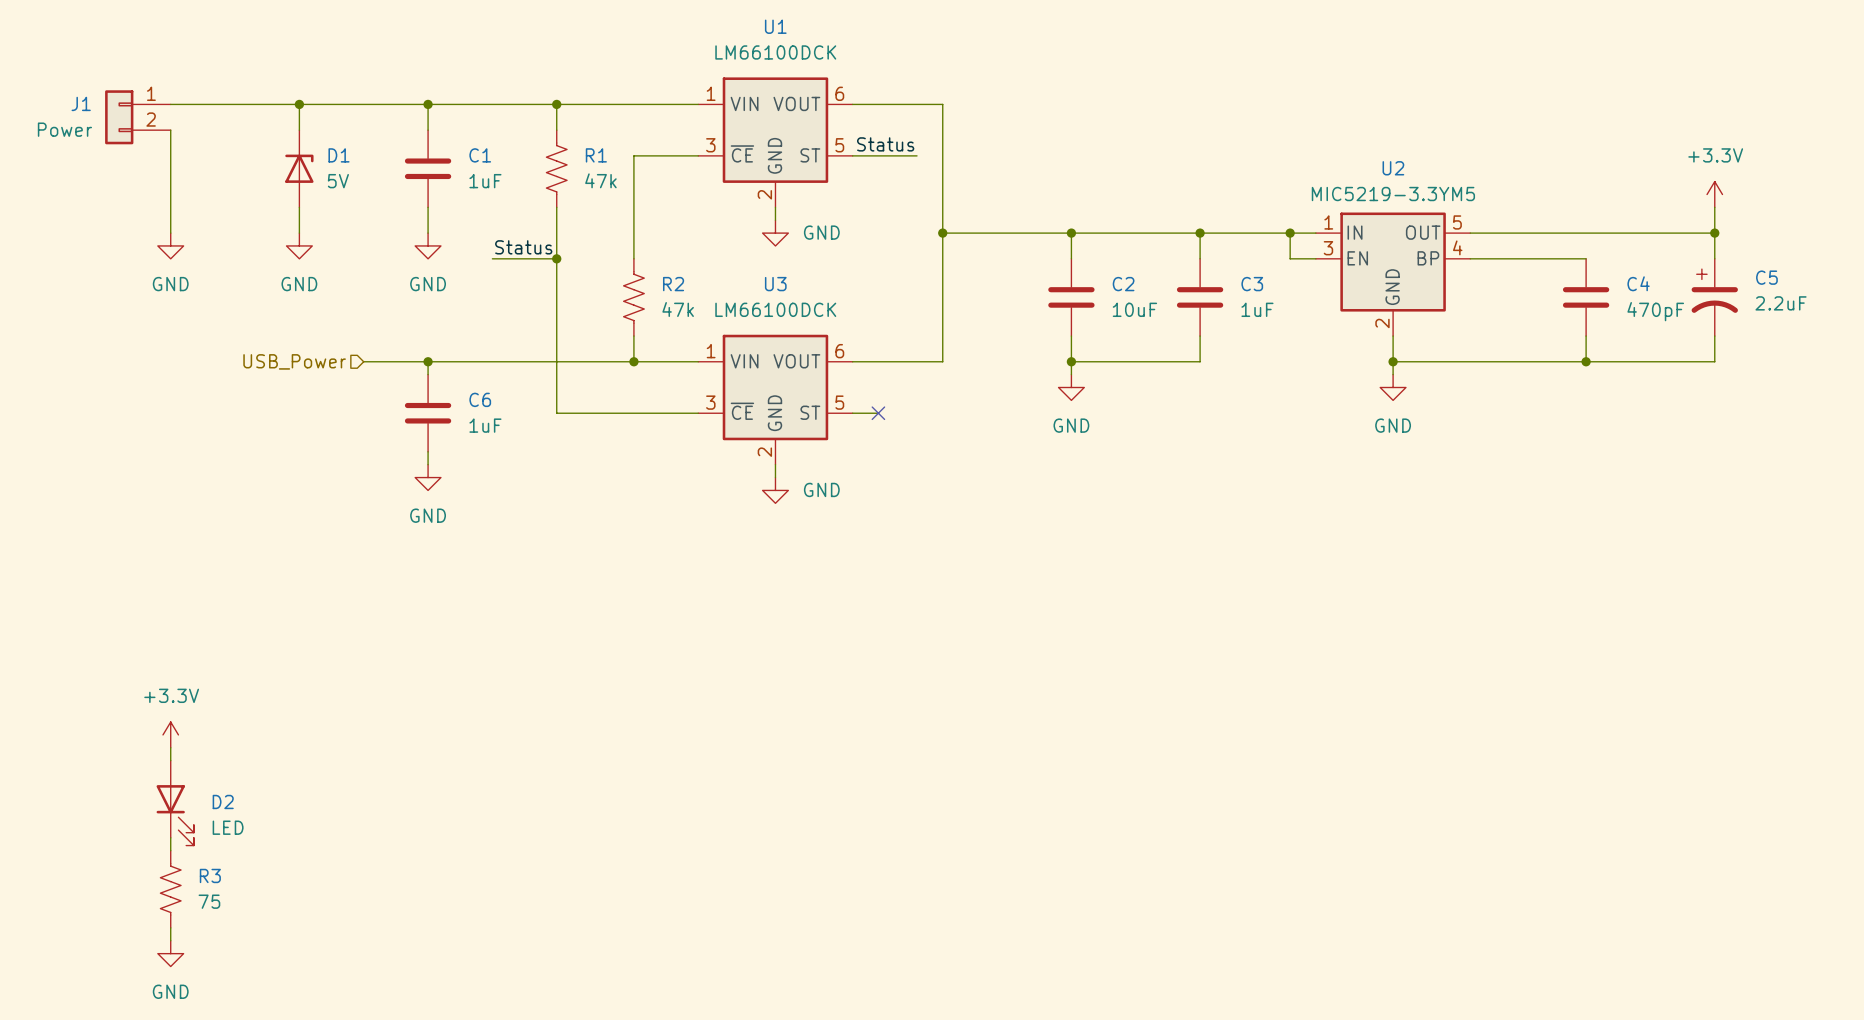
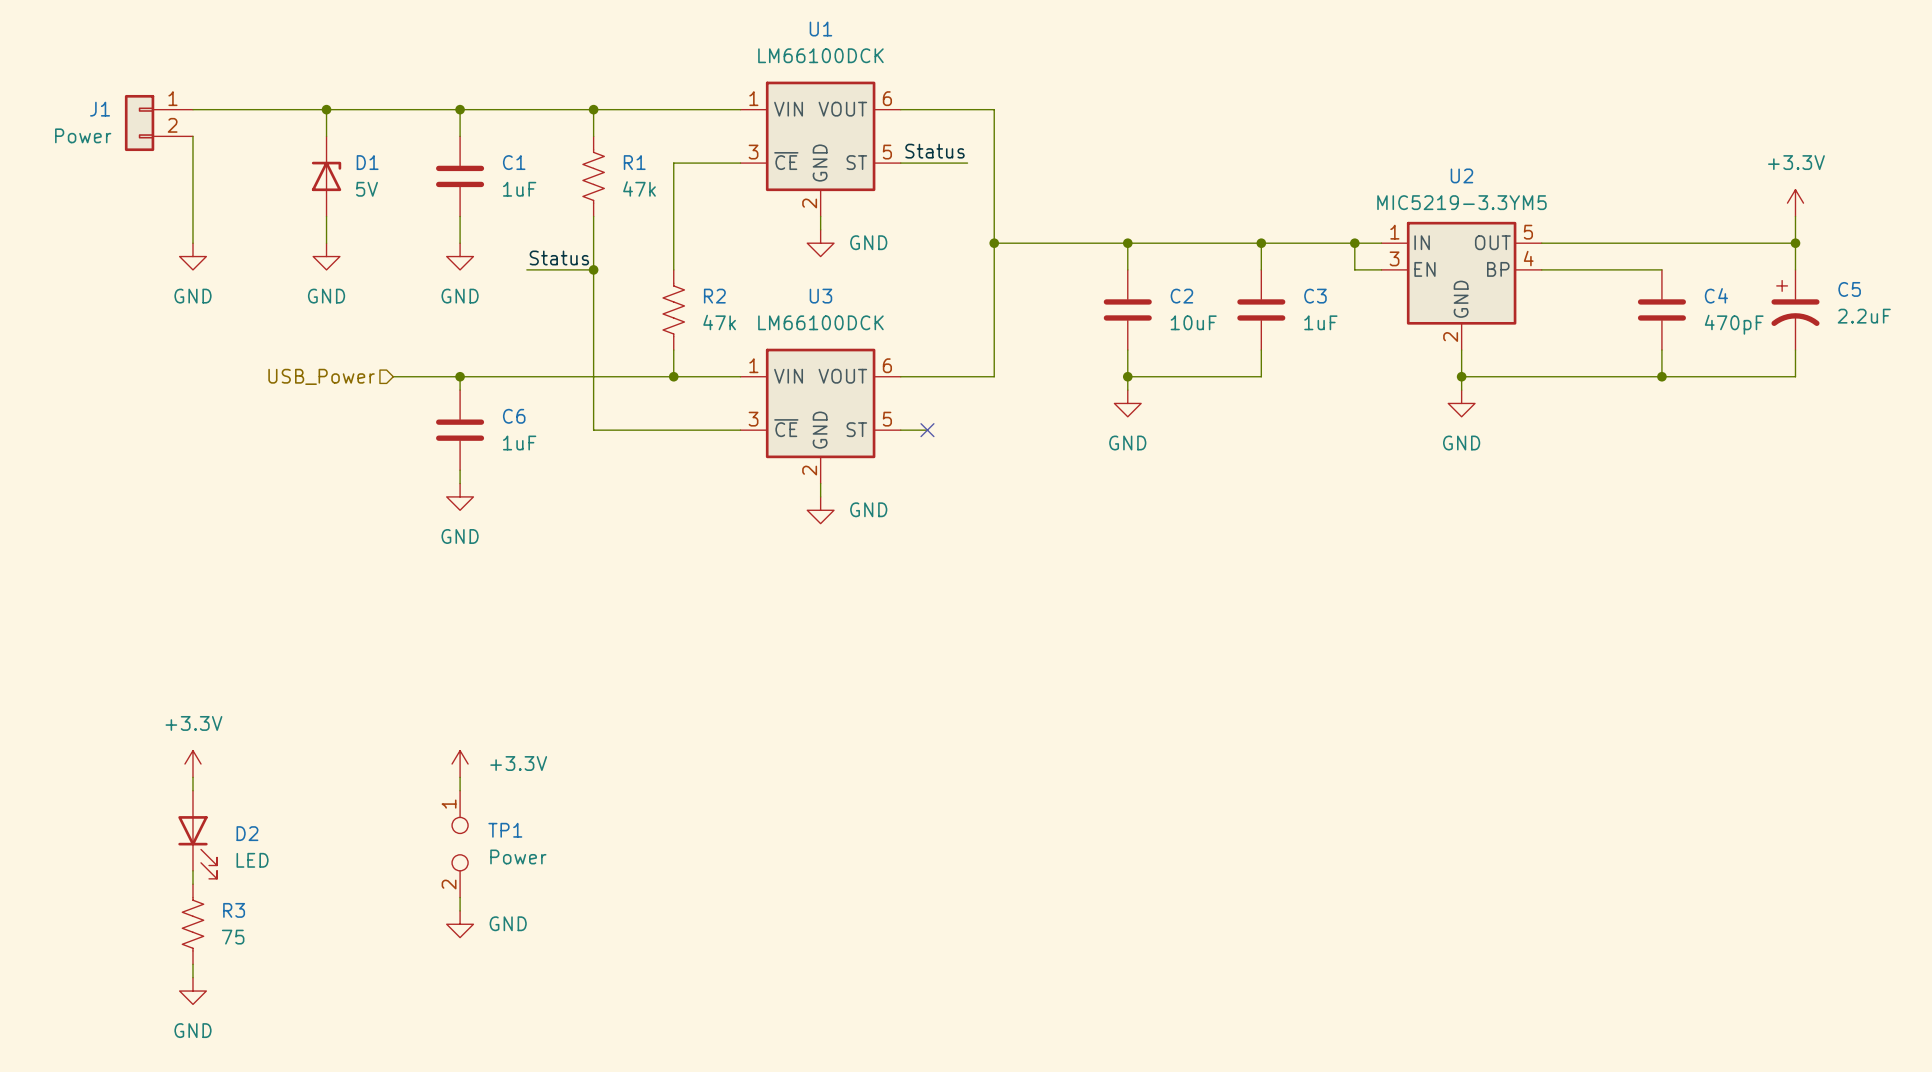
power symbol: none -> +3.3V (460, 764)
wire: none -> (460, 777) (460, 790)
TP1: none -> Power (460, 844)
wire: none -> (460, 897) (460, 910)
power symbol: none -> GND (460, 924)

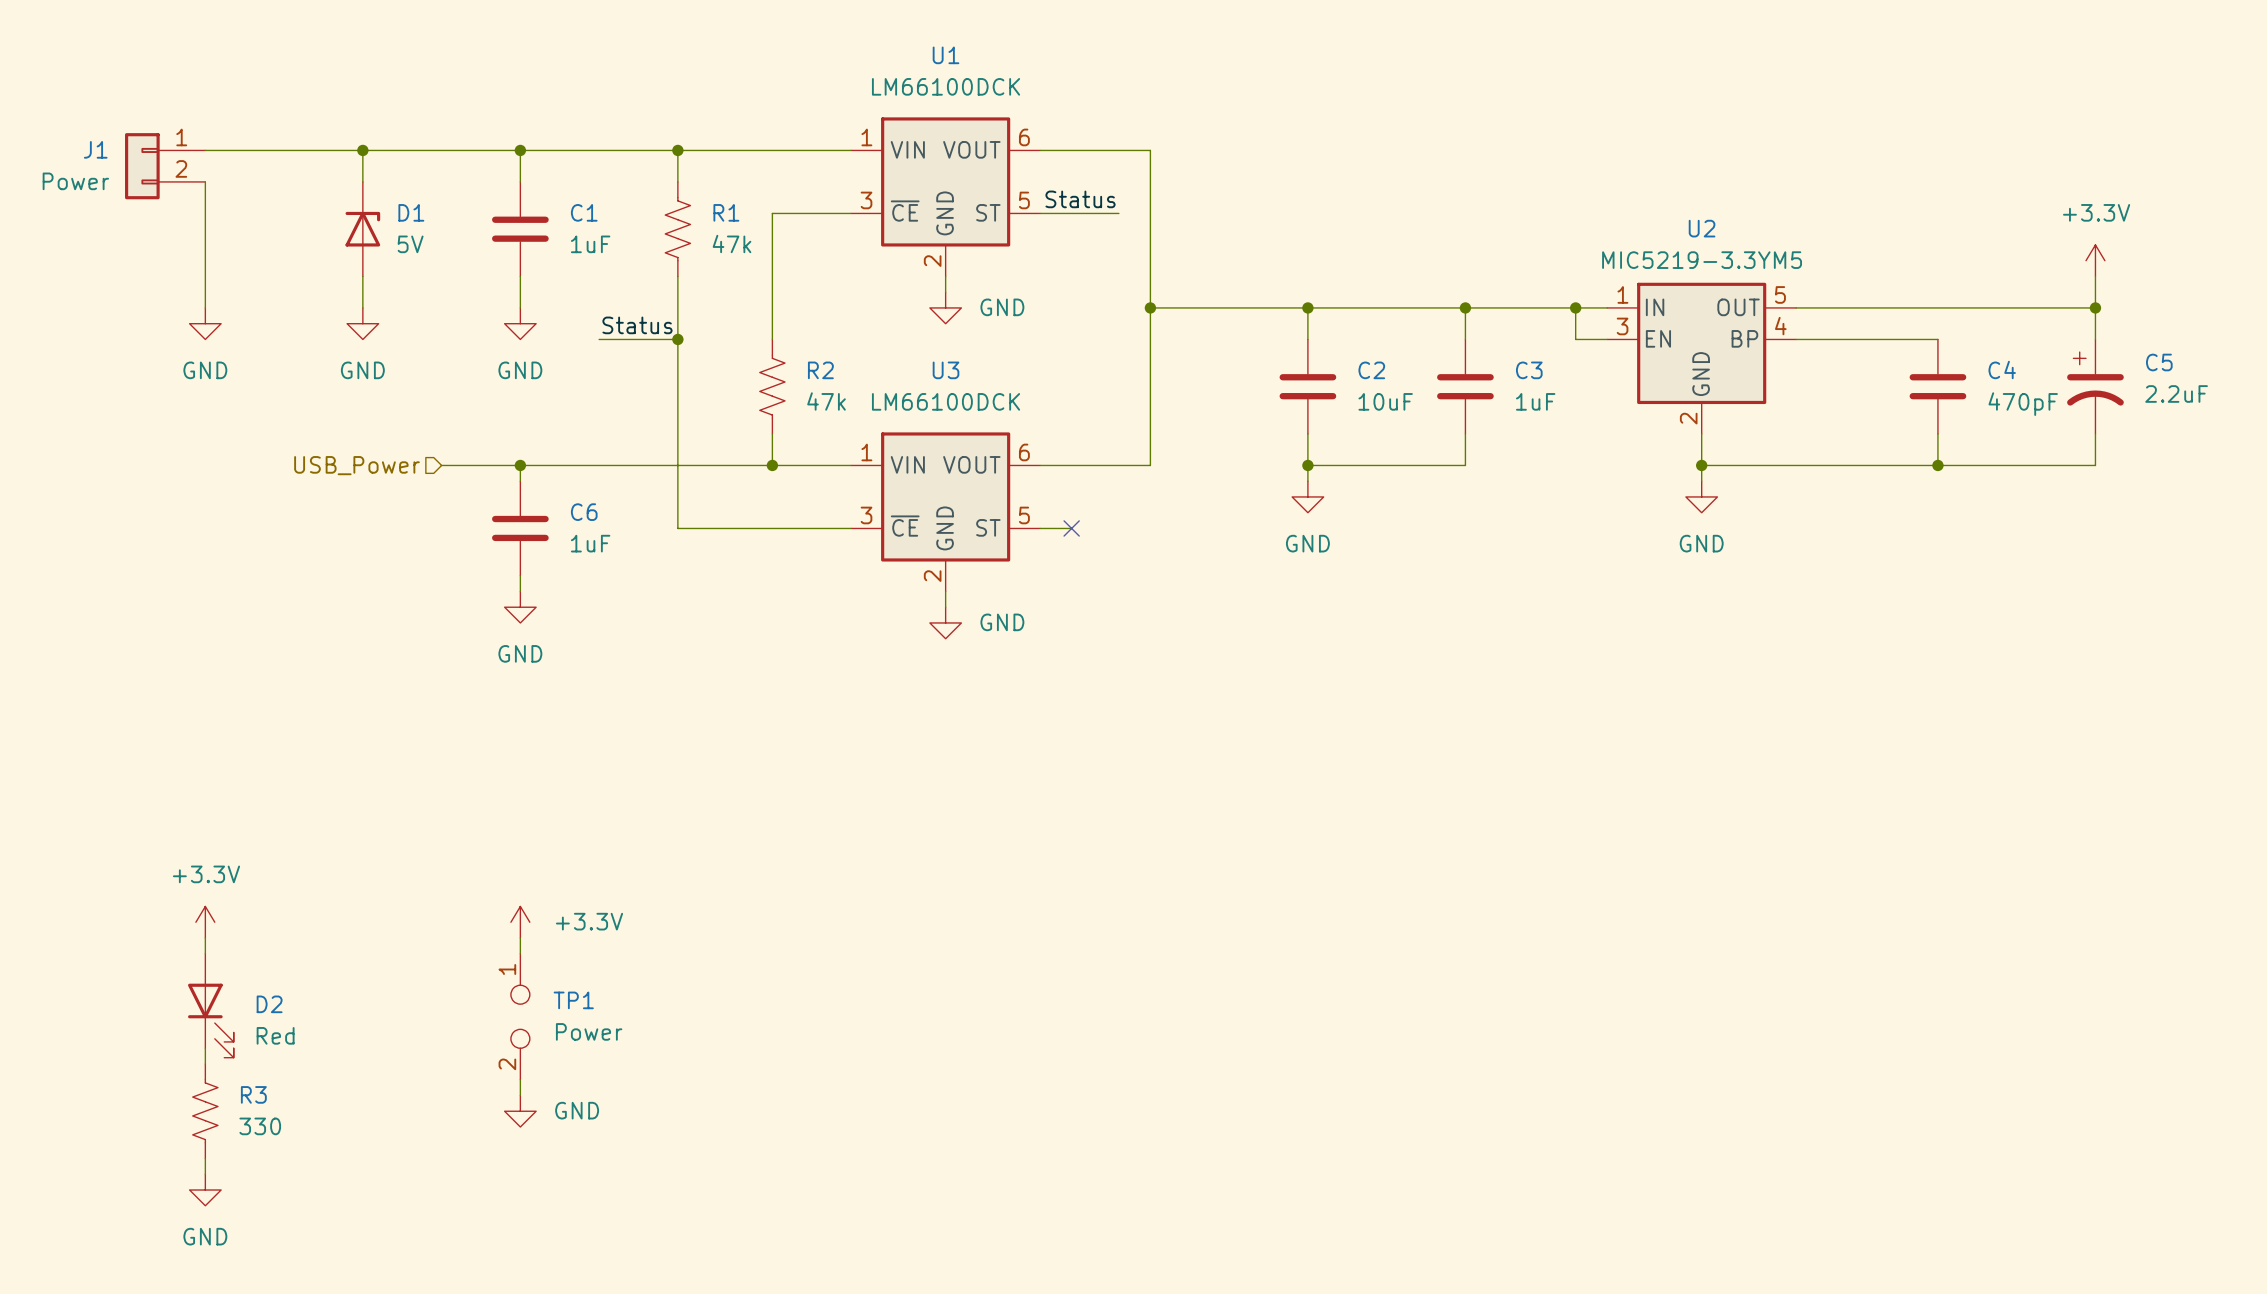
D2 value: LED (252, 860) -> Red (275, 1035)
R3 value: 75 (233, 937) -> 330 (260, 1126)

